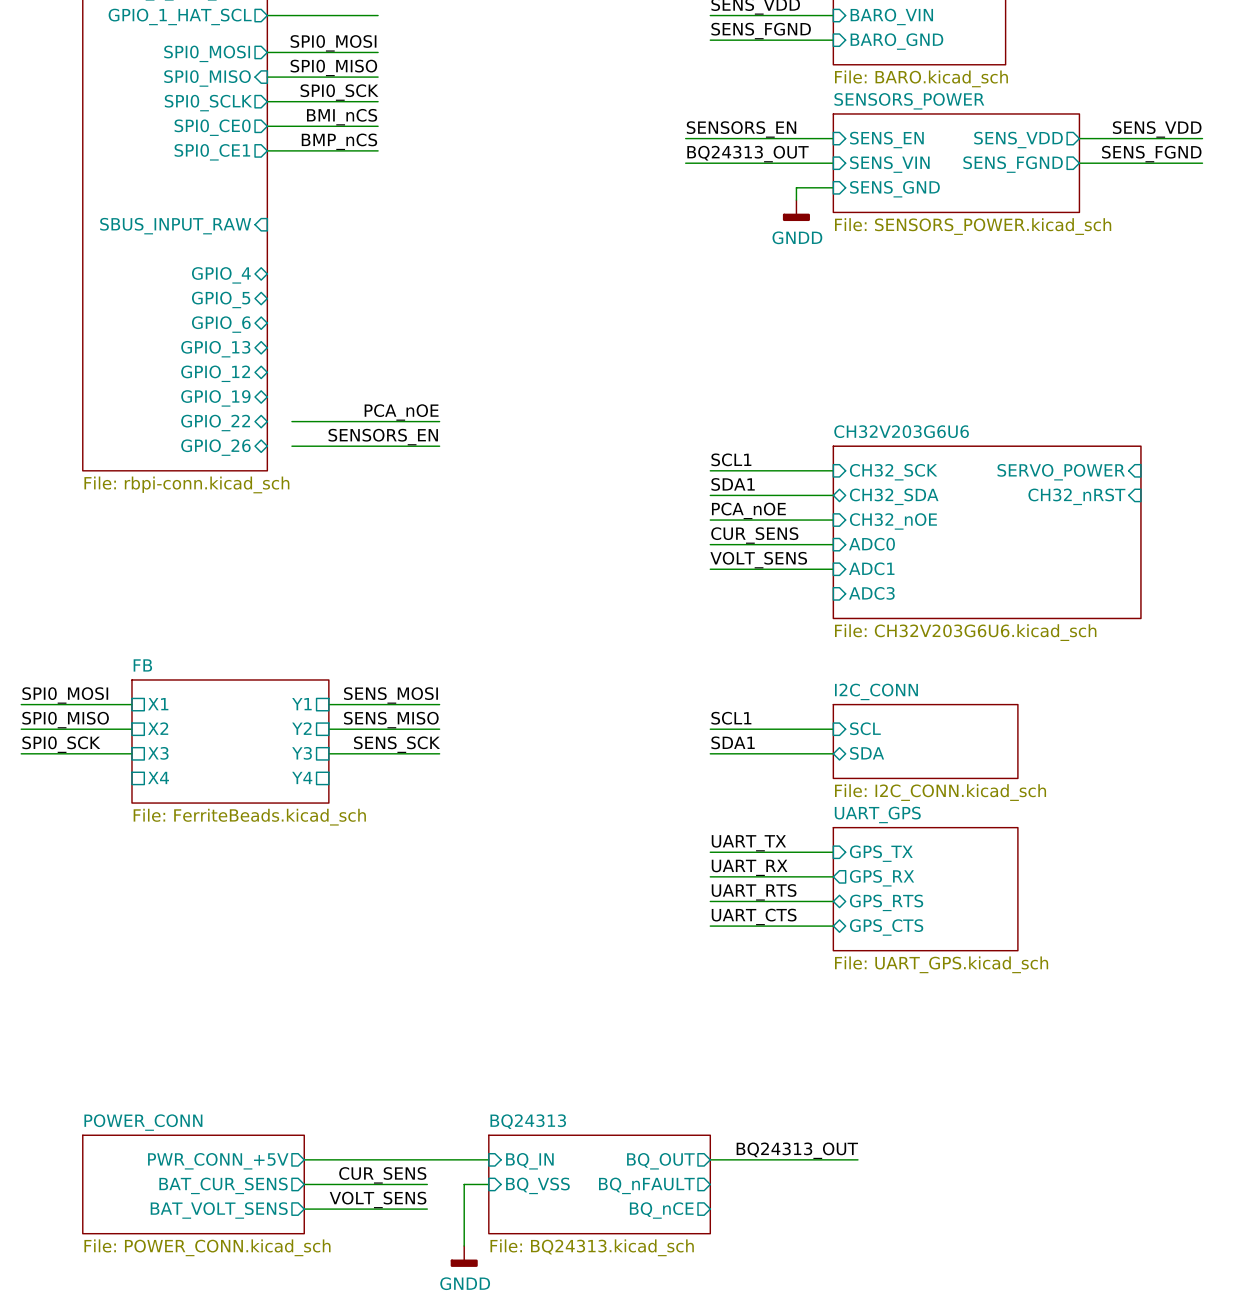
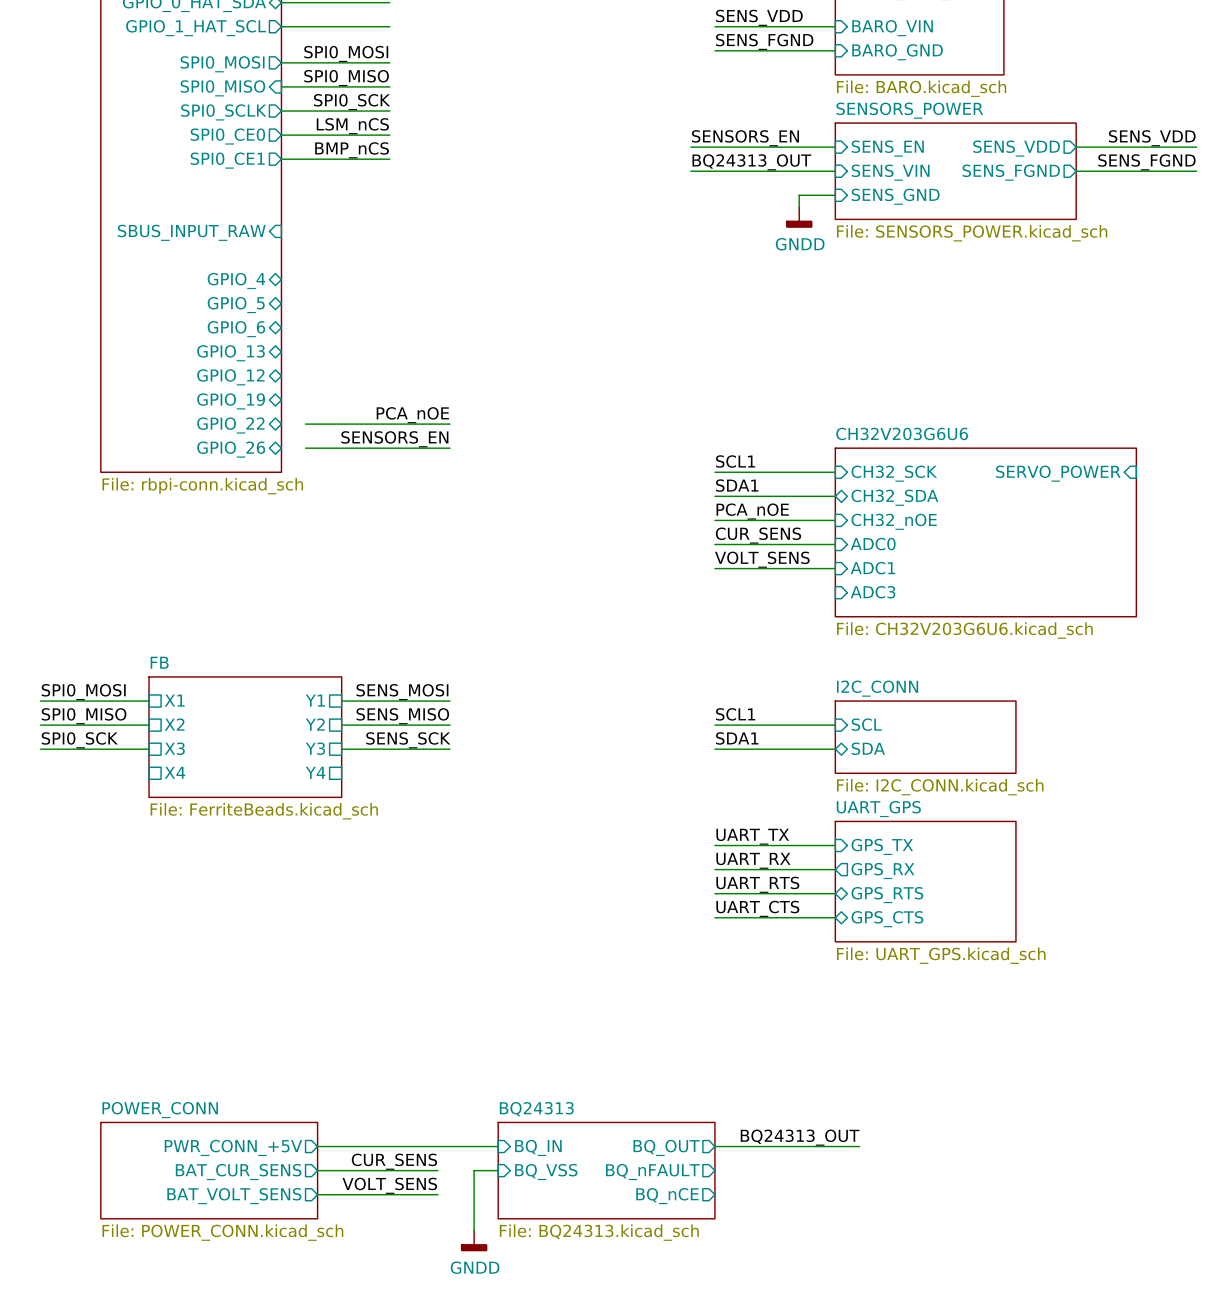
label: BMI_nCS (342, 117) -> LSM_nCS (352, 126)
sheet pin: CH32_nRST (1076, 496) -> none

